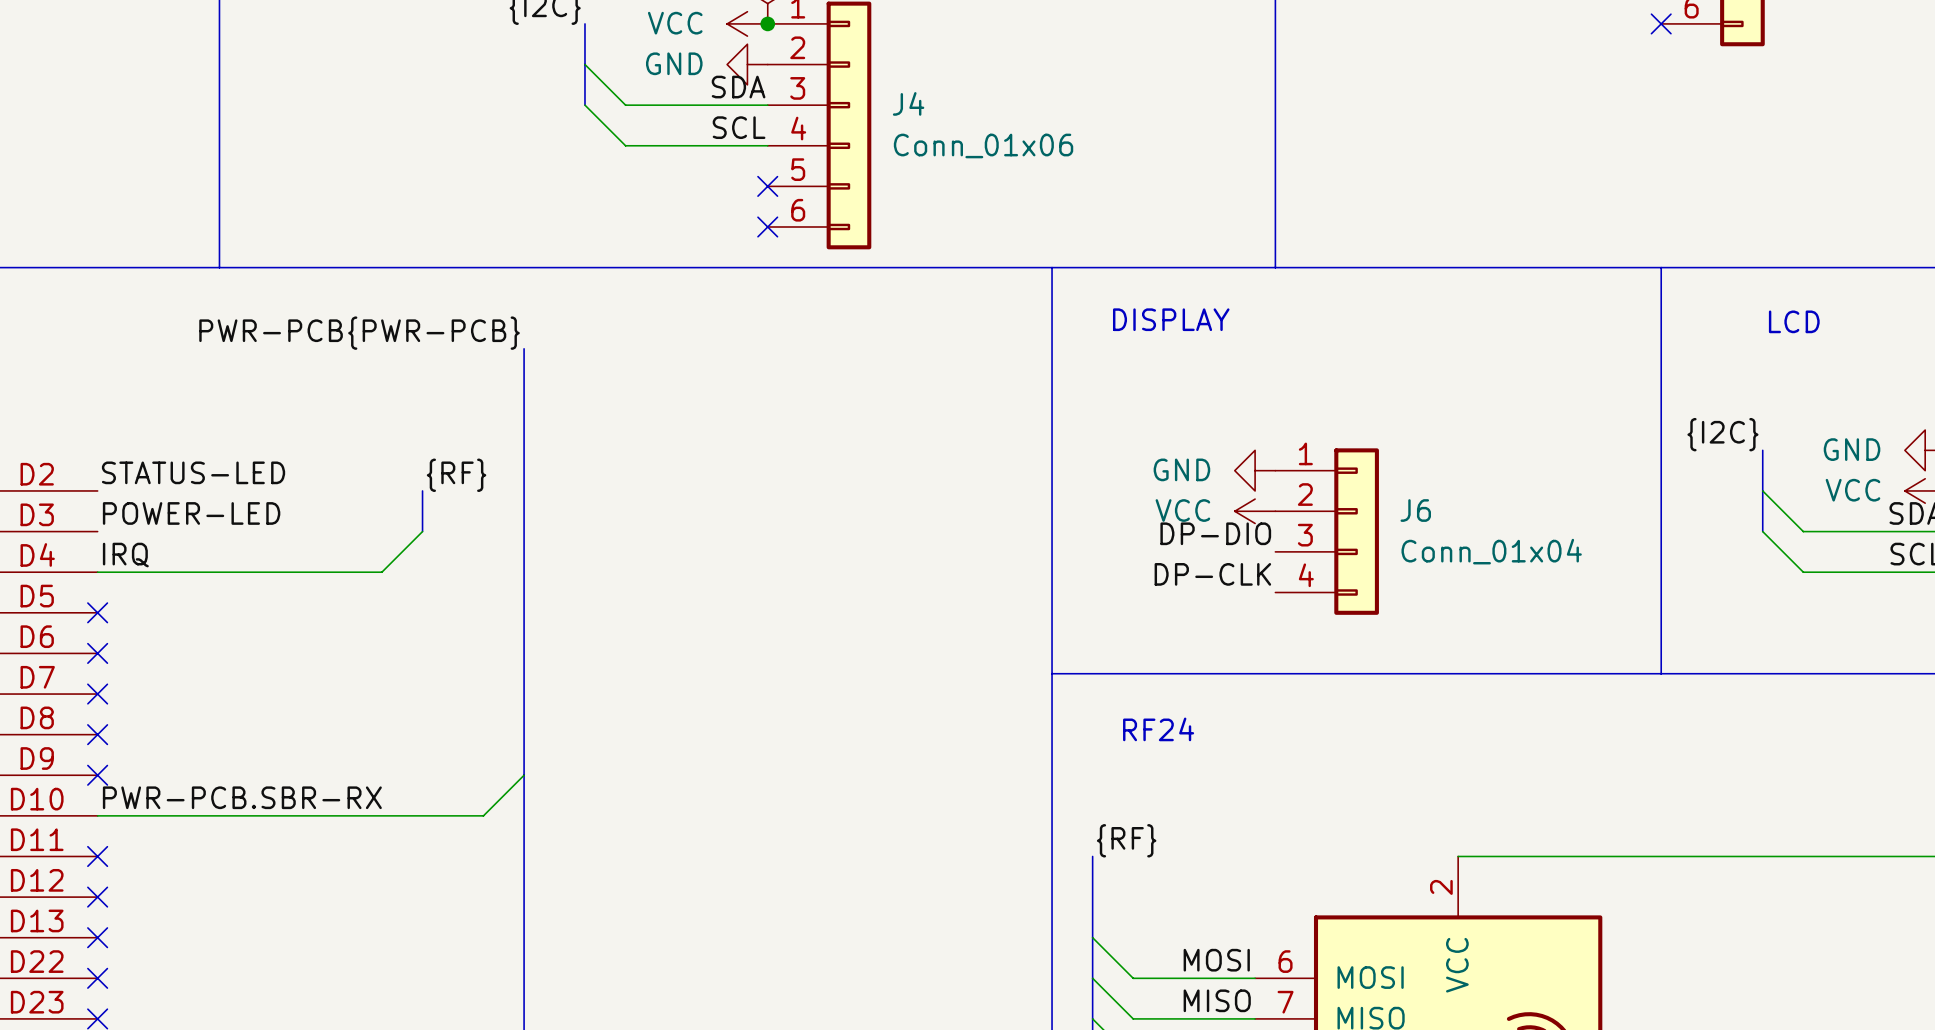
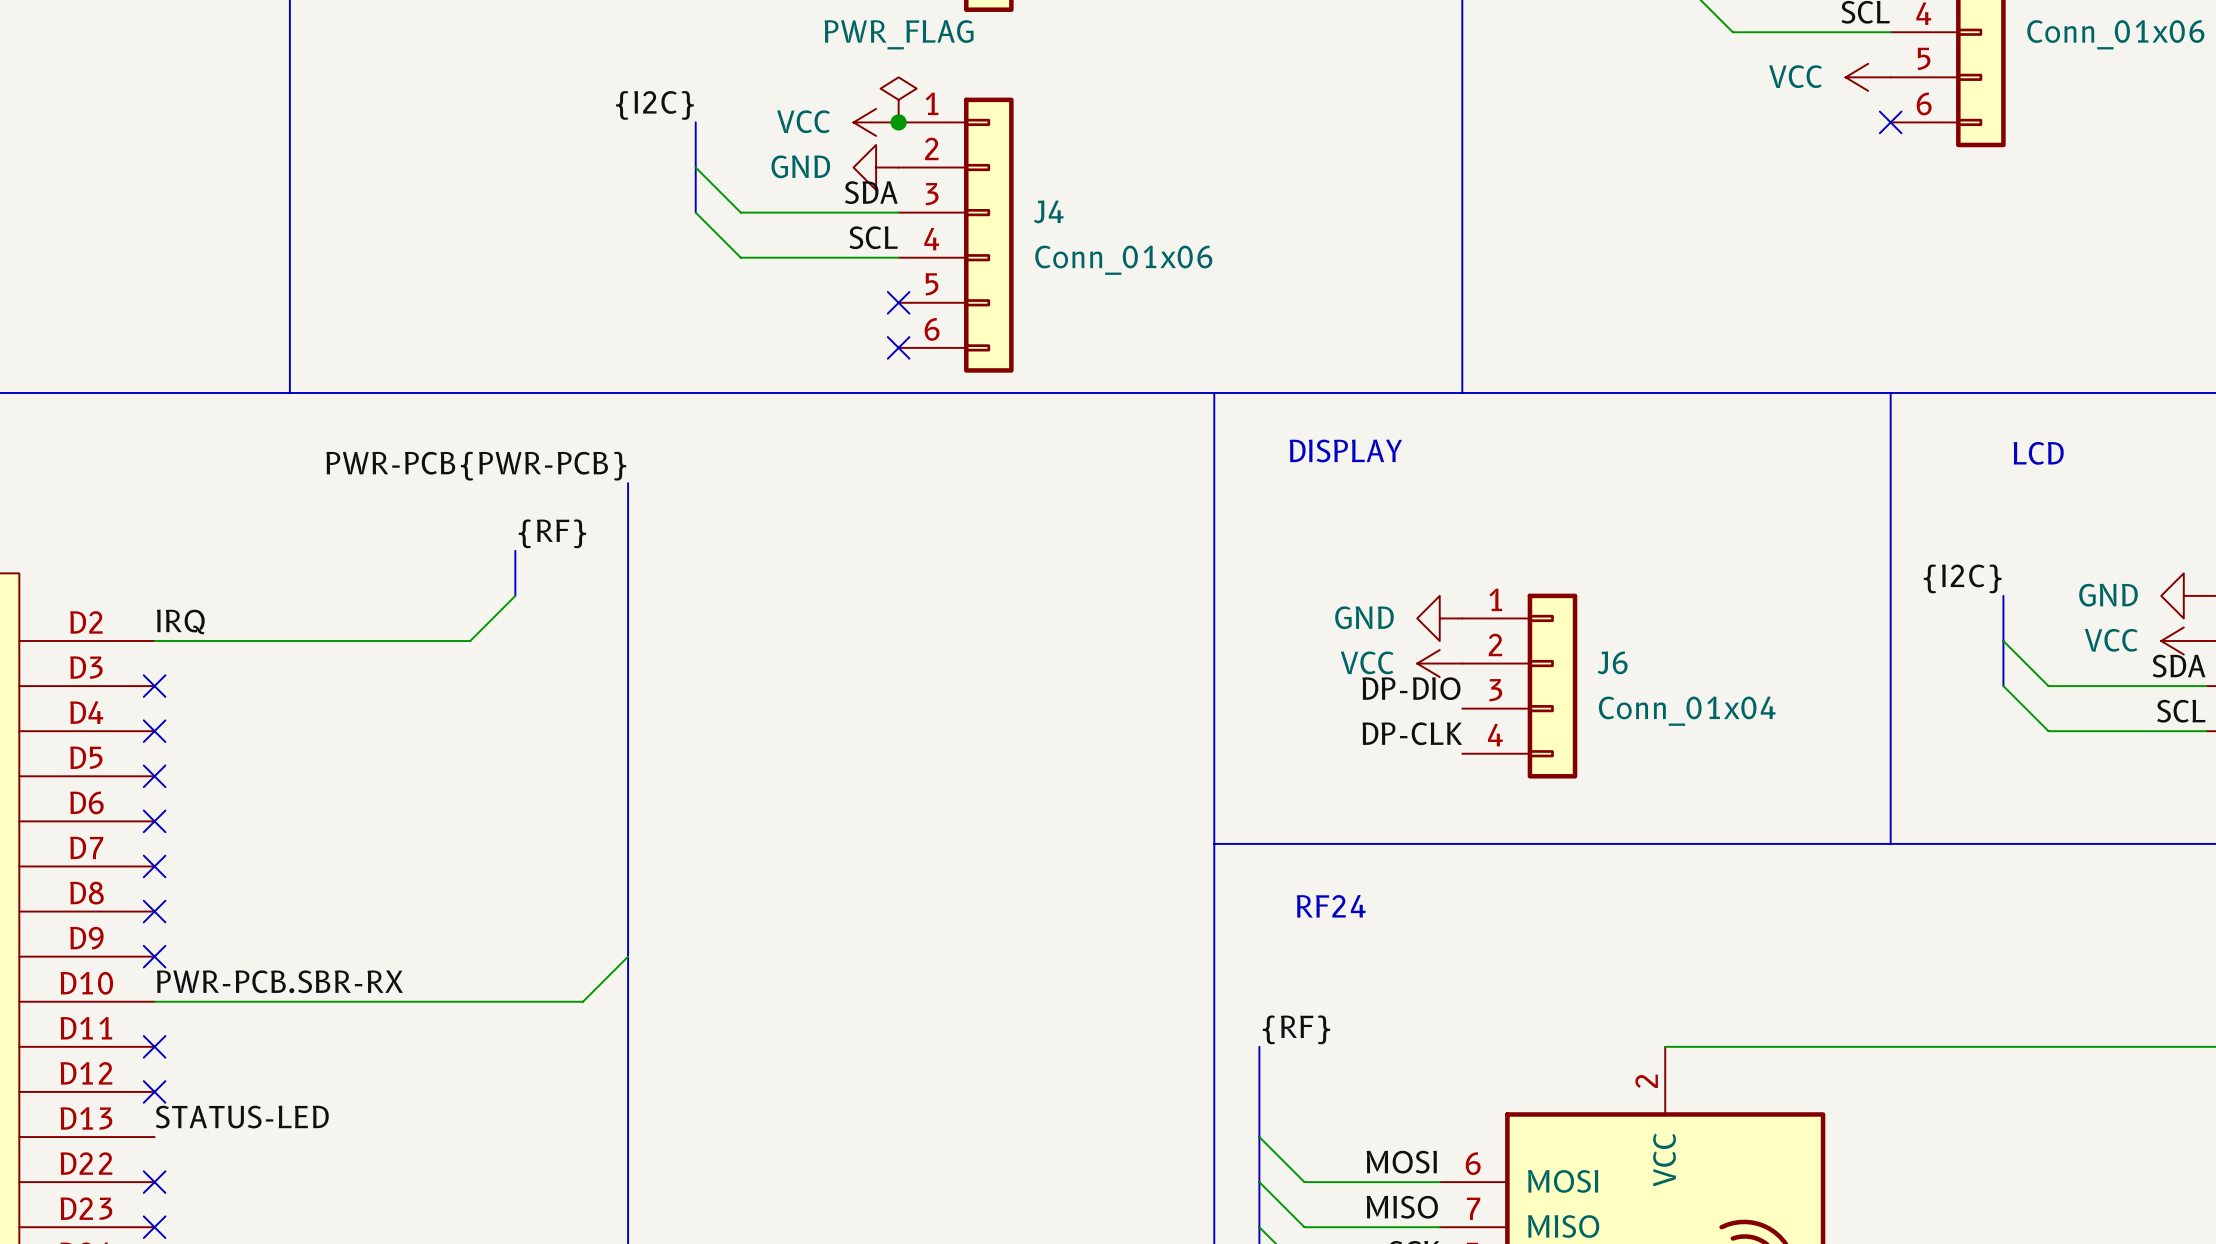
label: STATUS-LED (193, 472) -> IRQ (180, 621)
label position: {RF} (456, 475) -> {RF} (552, 533)
bus: (422, 490) (422, 531) -> (515, 550) (515, 595)
label: POWER-LED (191, 513) -> none
no-connect mark: none -> (154, 686)
wire: (422, 531) (381, 572) (97, 572) -> (515, 595) (470, 641) (154, 641)
label: IRQ (125, 555) -> none
no-connect mark: none -> (154, 731)
label: none -> STATUS-LED (242, 1117)
no-connect mark: (97, 937) -> none

